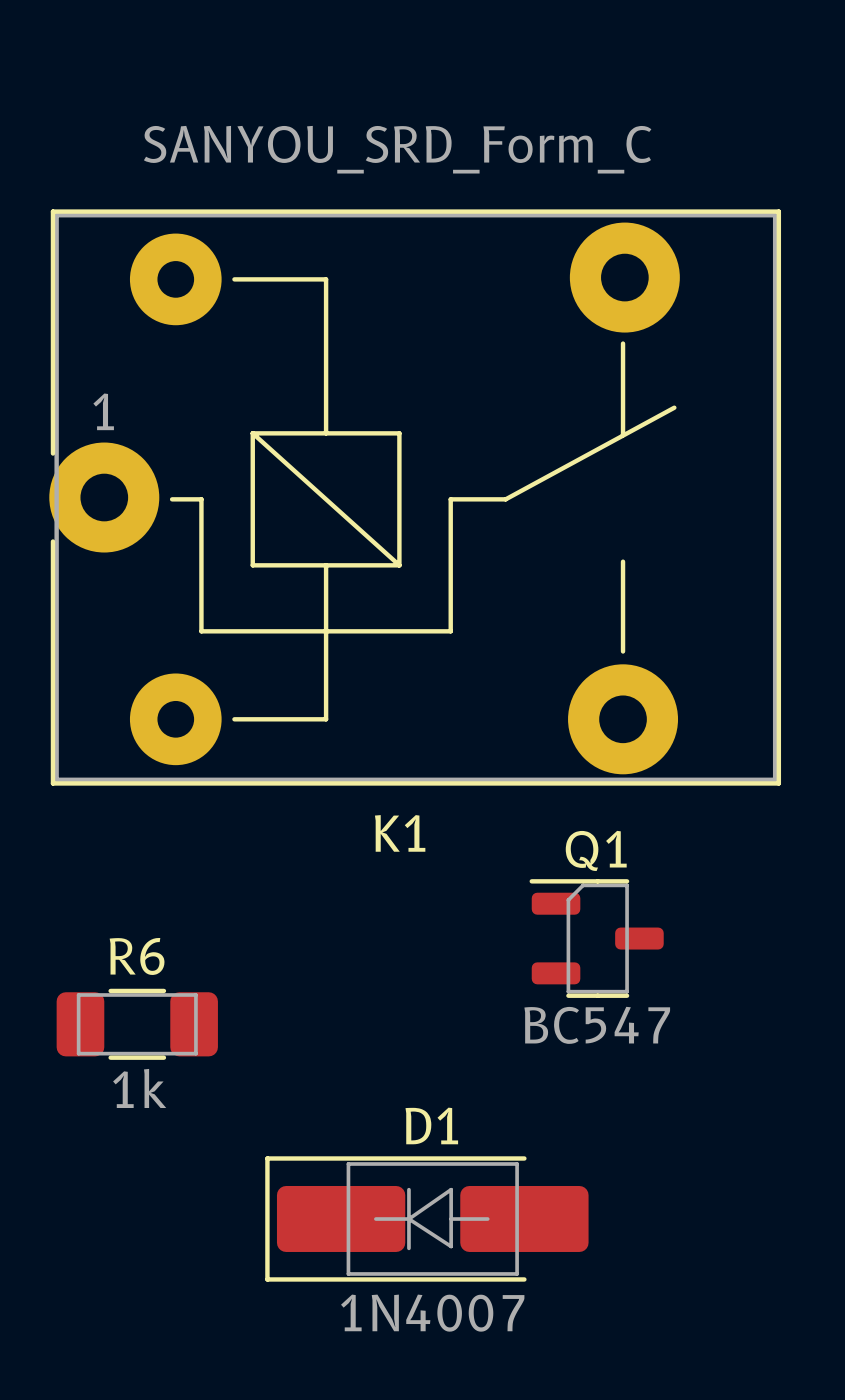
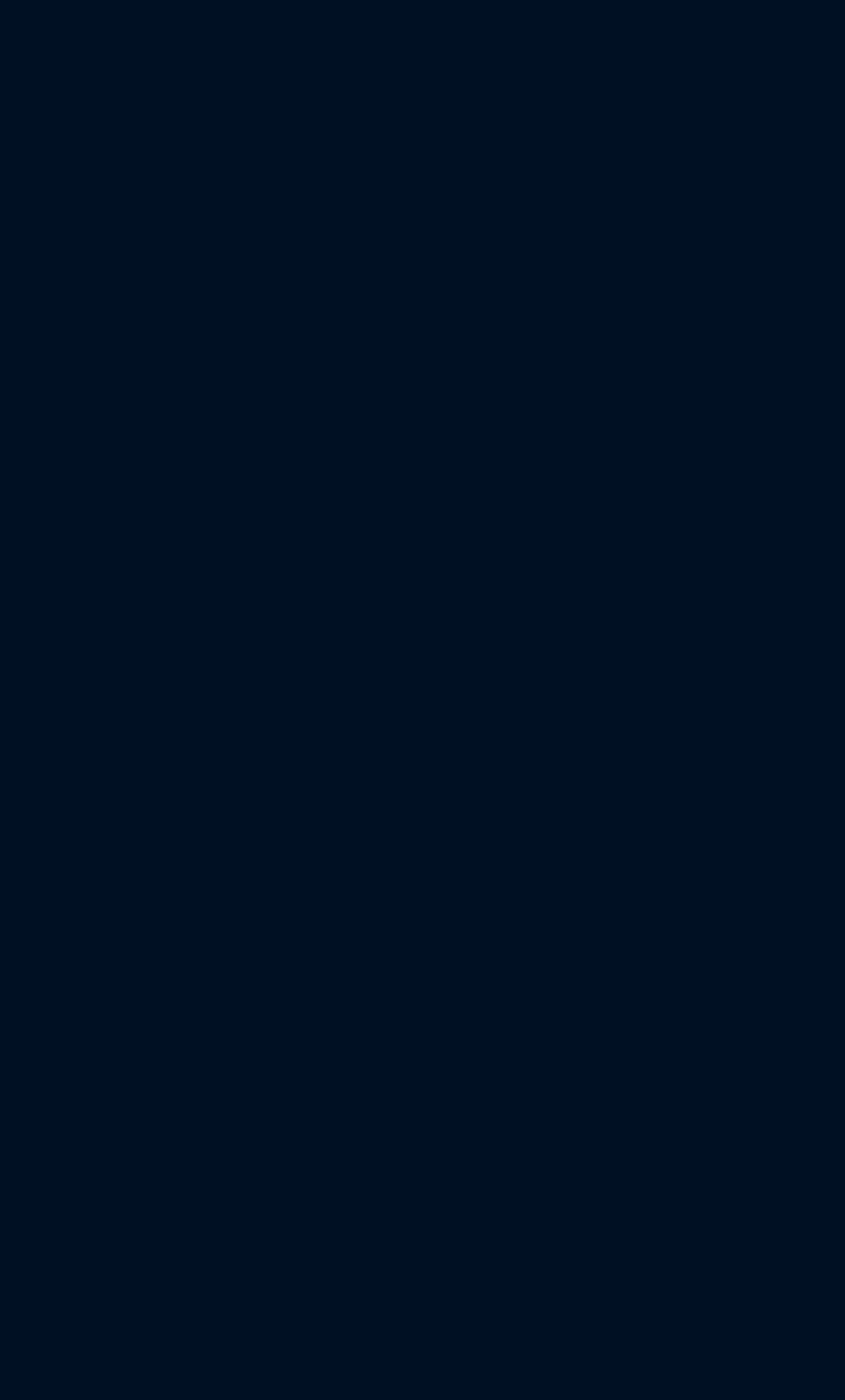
K1: SANYOU_SRD_Form_C (415, 497) -> none
Q1: BC547 (596, 938) -> none
R6: 1k (137, 1024) -> none
D1: 1N4007 (426, 1218) -> none

